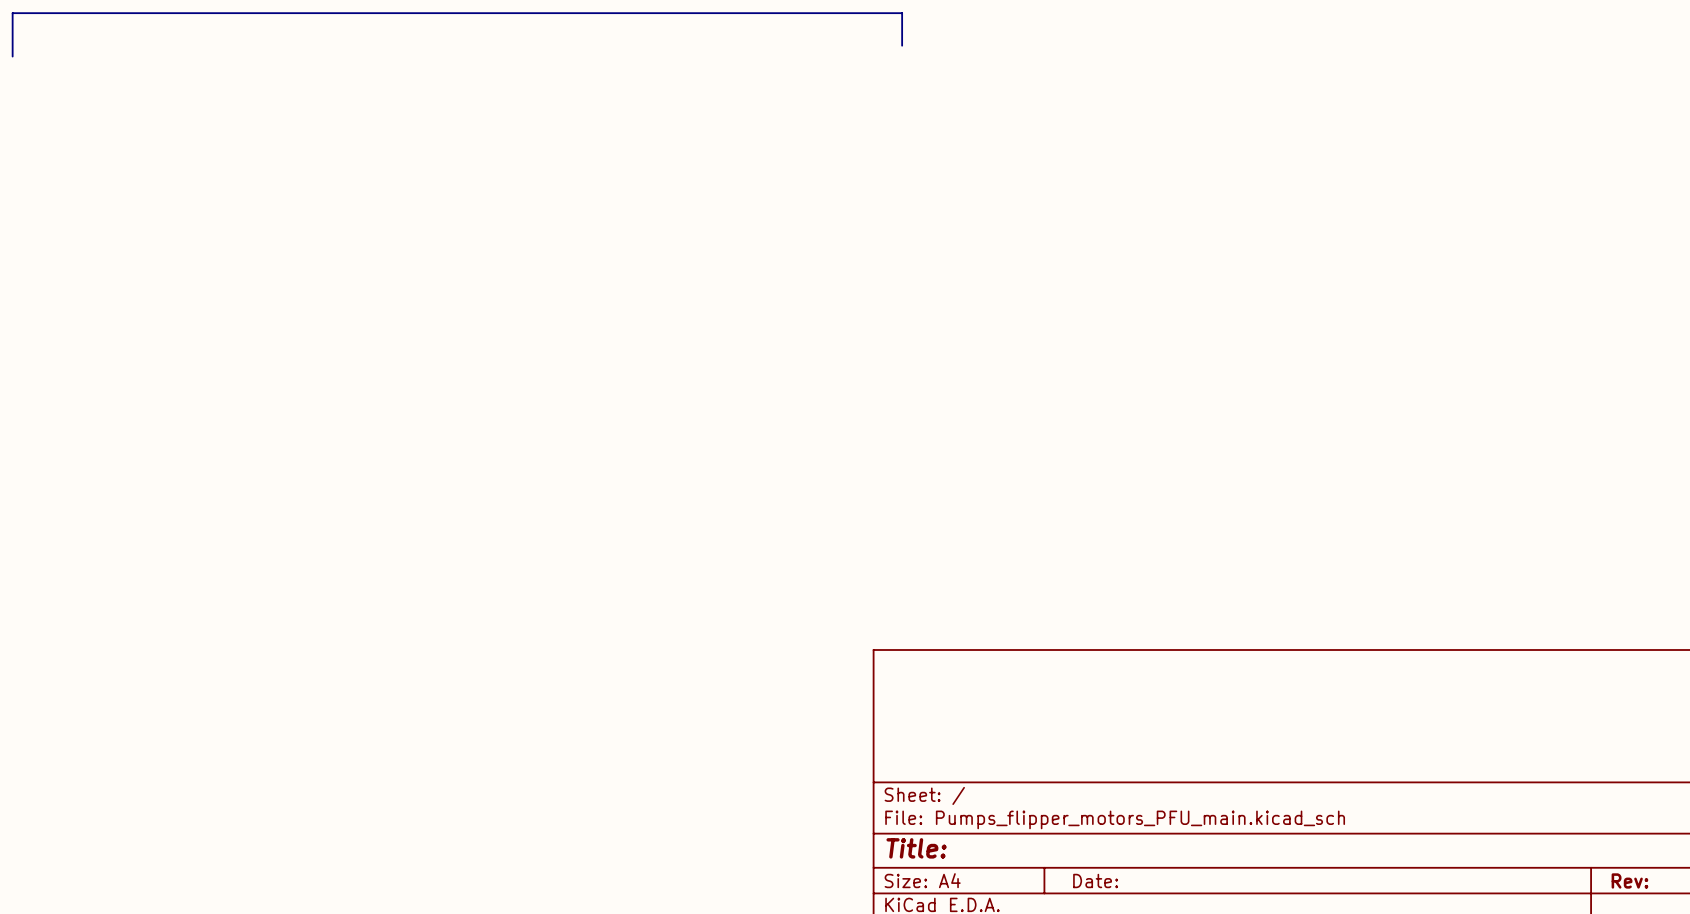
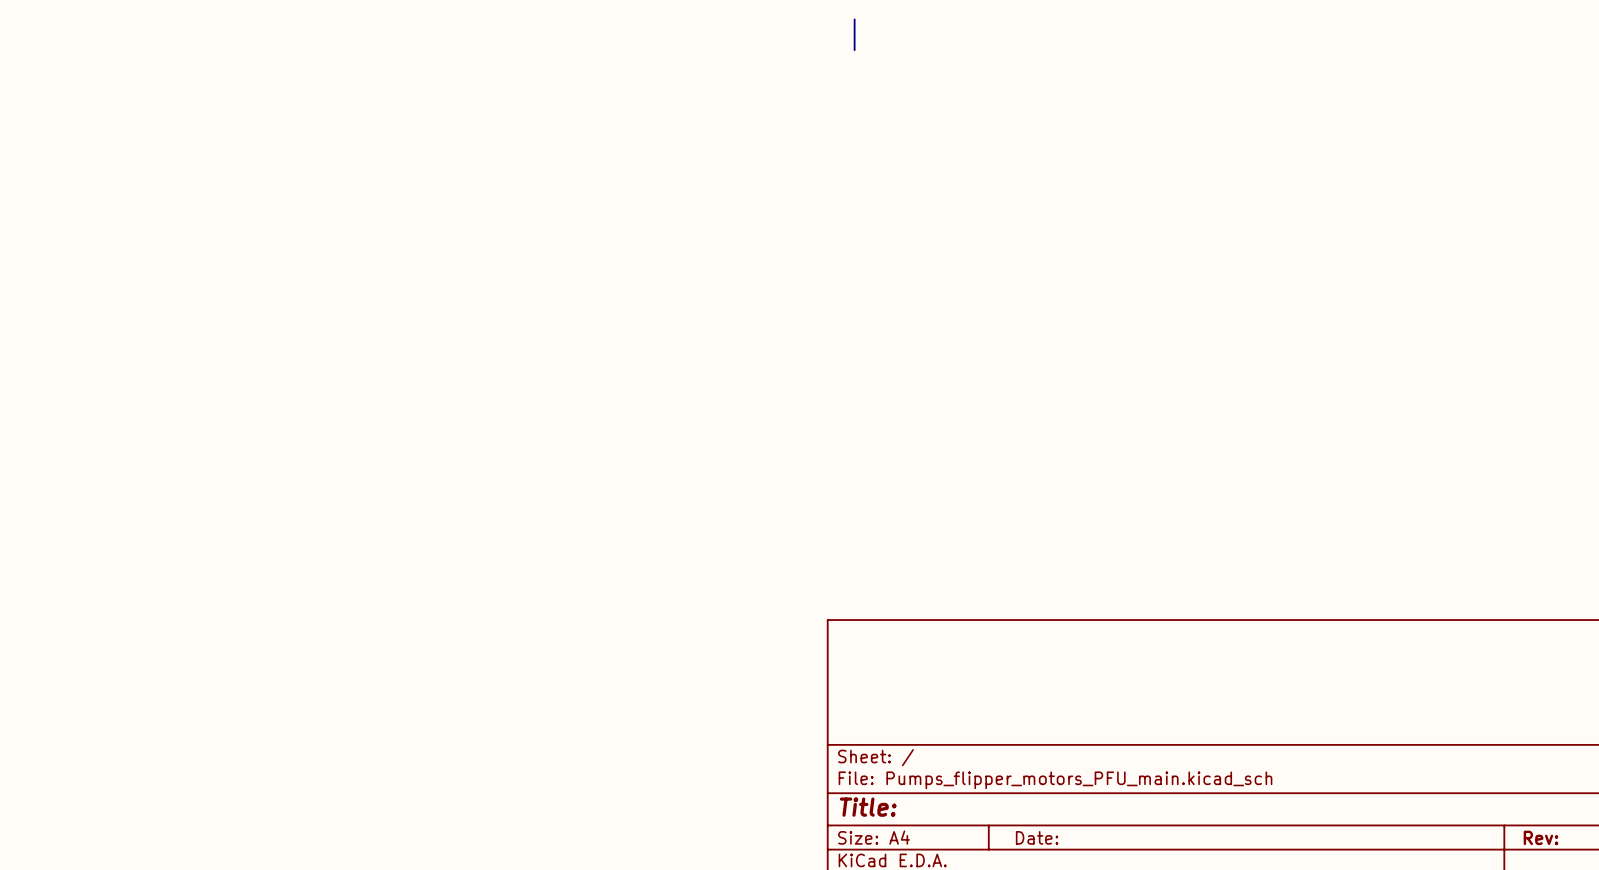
wire: (902, 13) (12, 13) (12, 56) -> none

